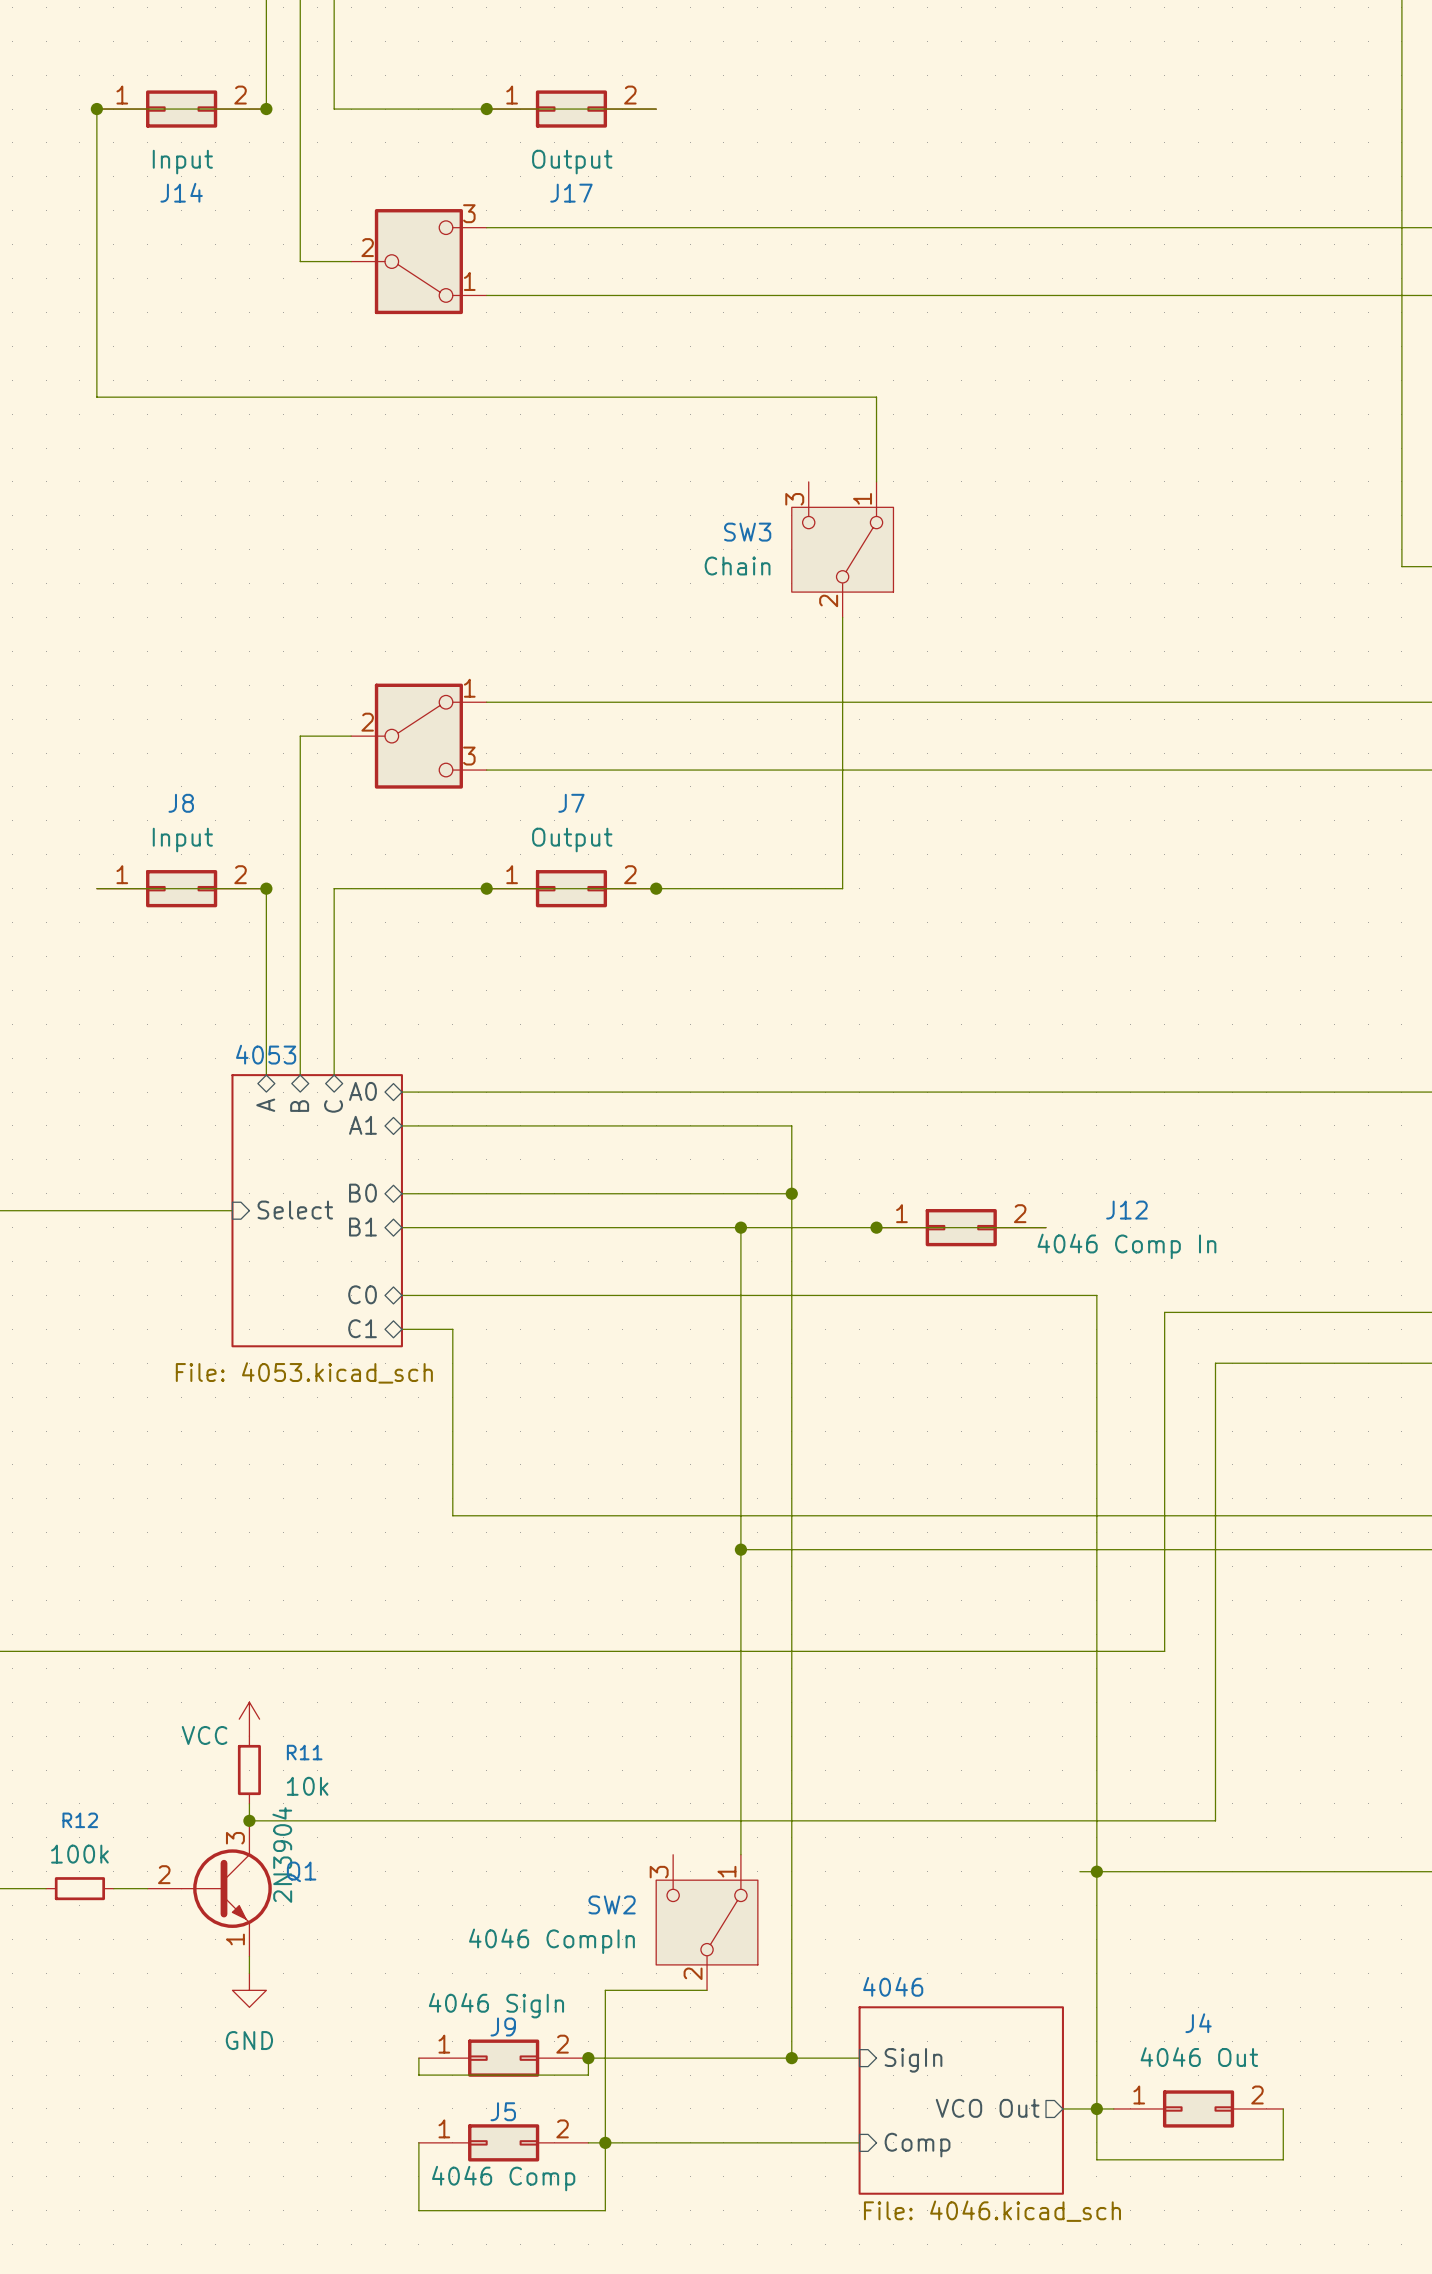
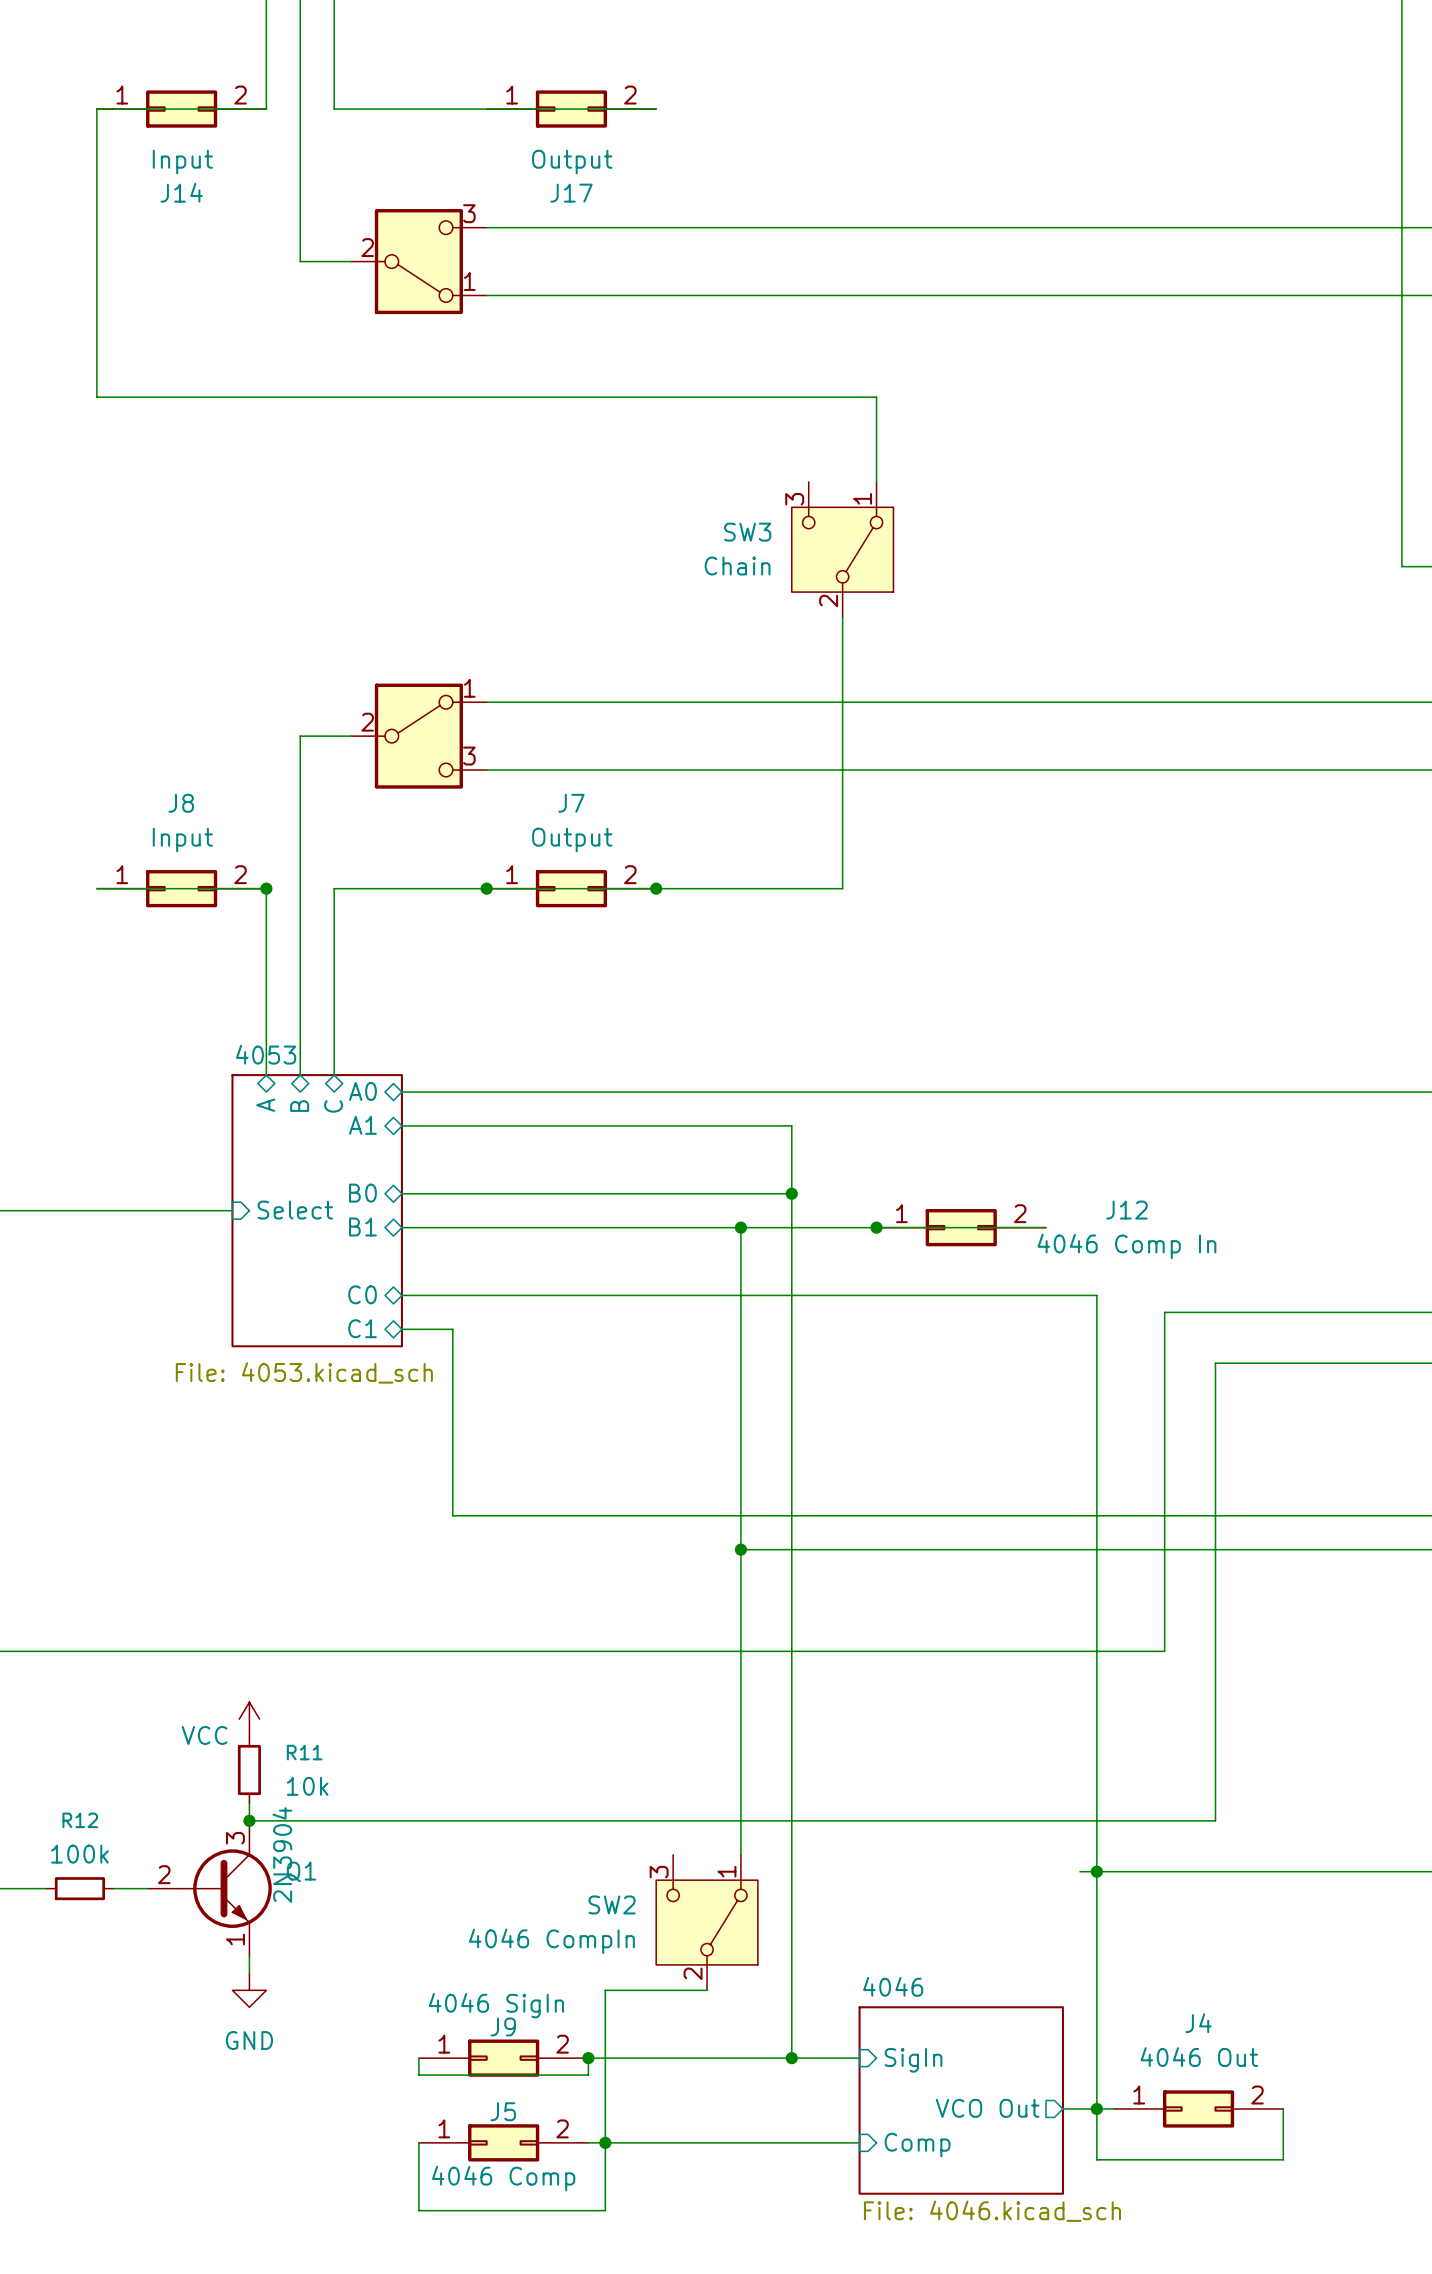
junction: (96, 109) -> none
junction: (266, 109) -> none
junction: (486, 109) -> none

